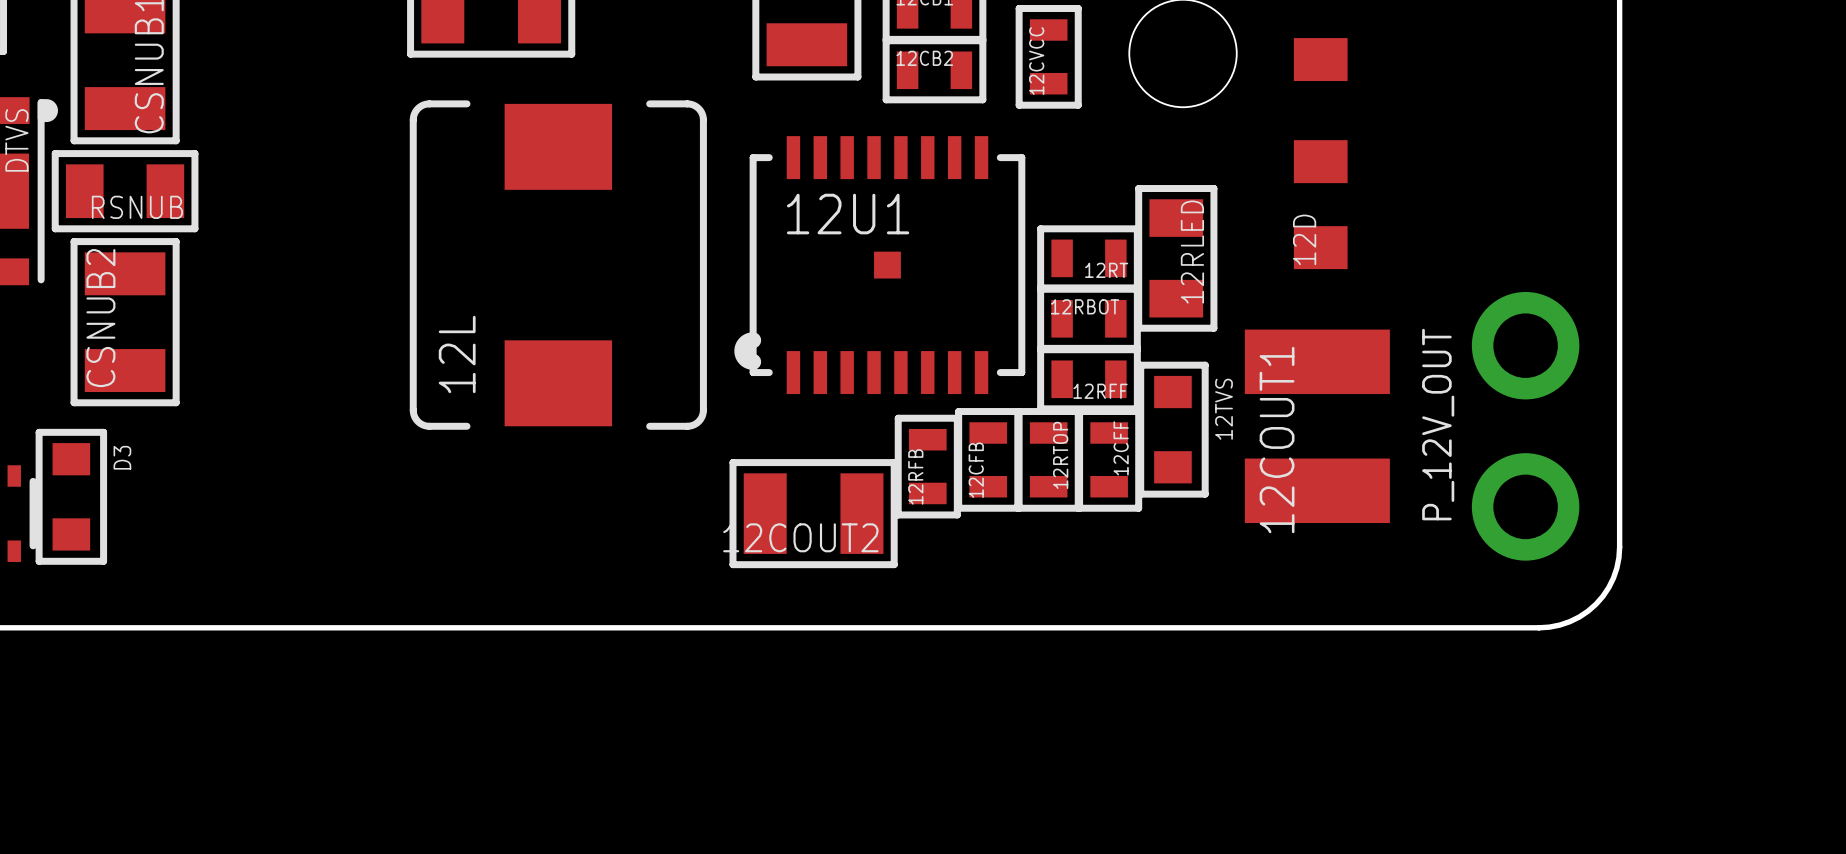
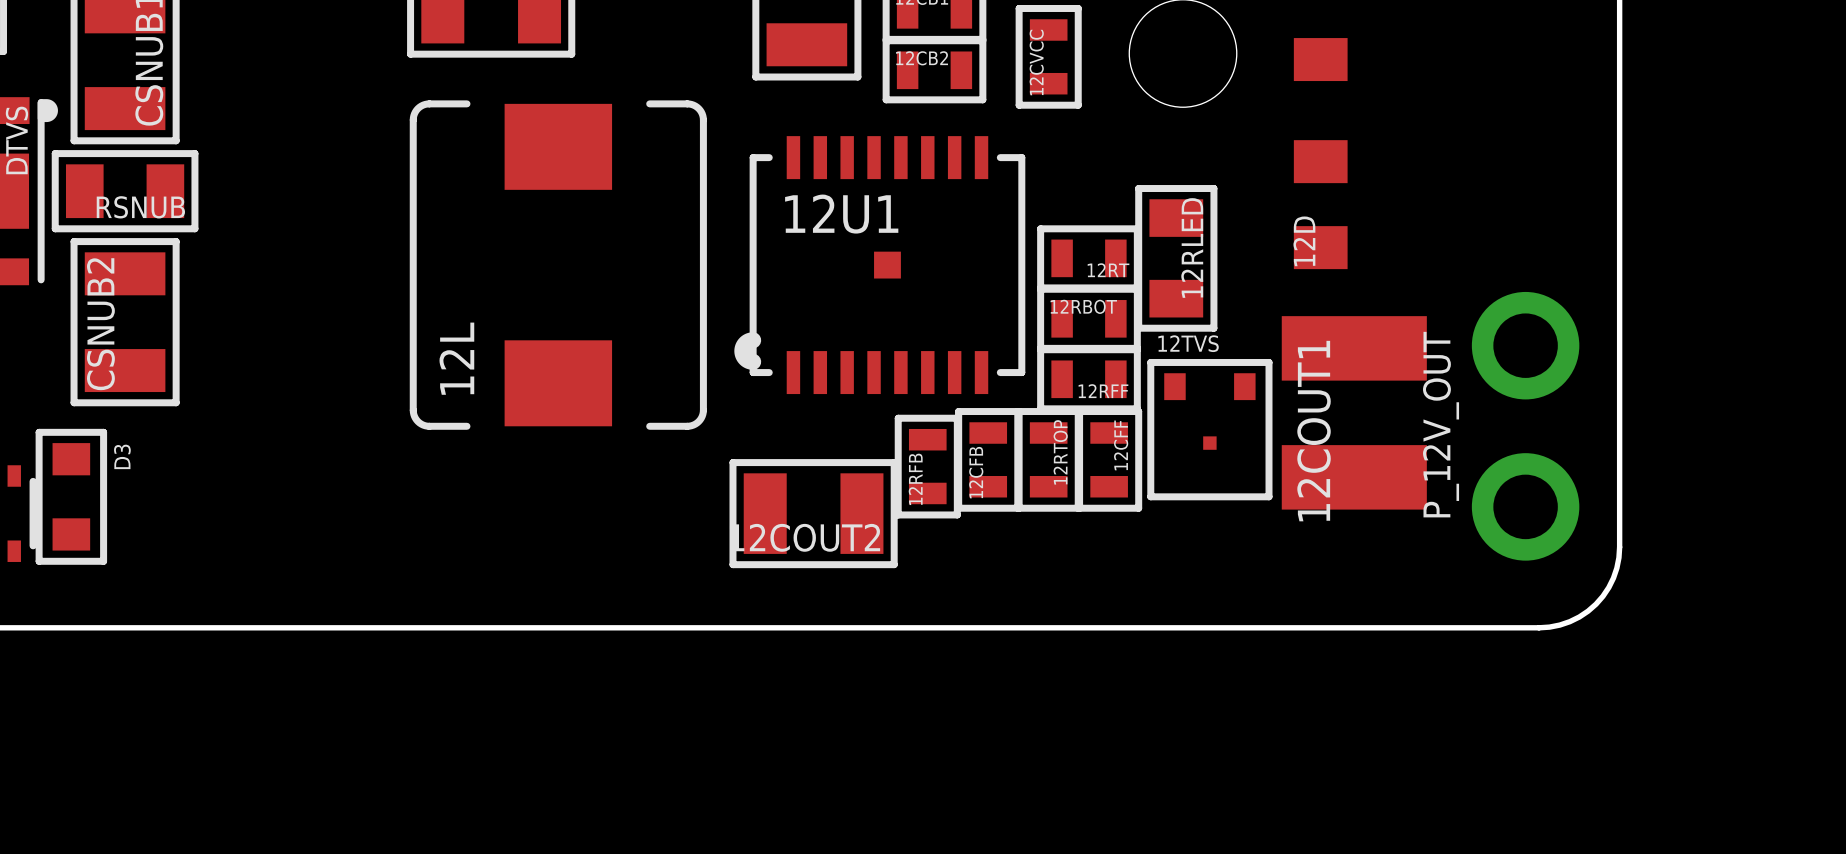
12TVS footprint: [1137, 361, 1209, 498] -> [1147, 358, 1273, 501]
12COUT1 position: (1317, 426) -> (1354, 412)

